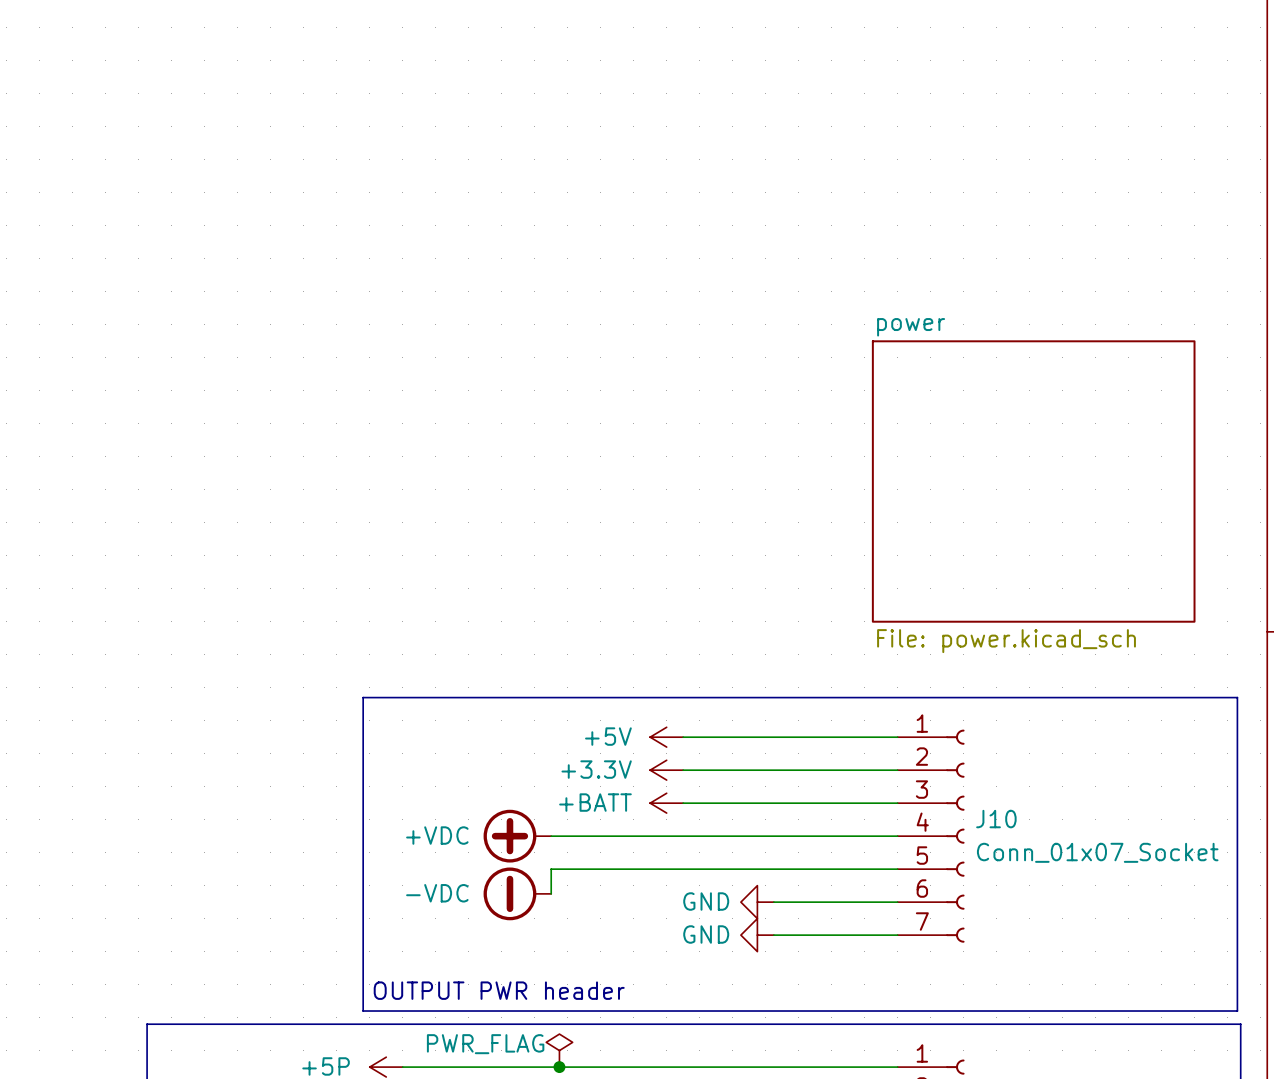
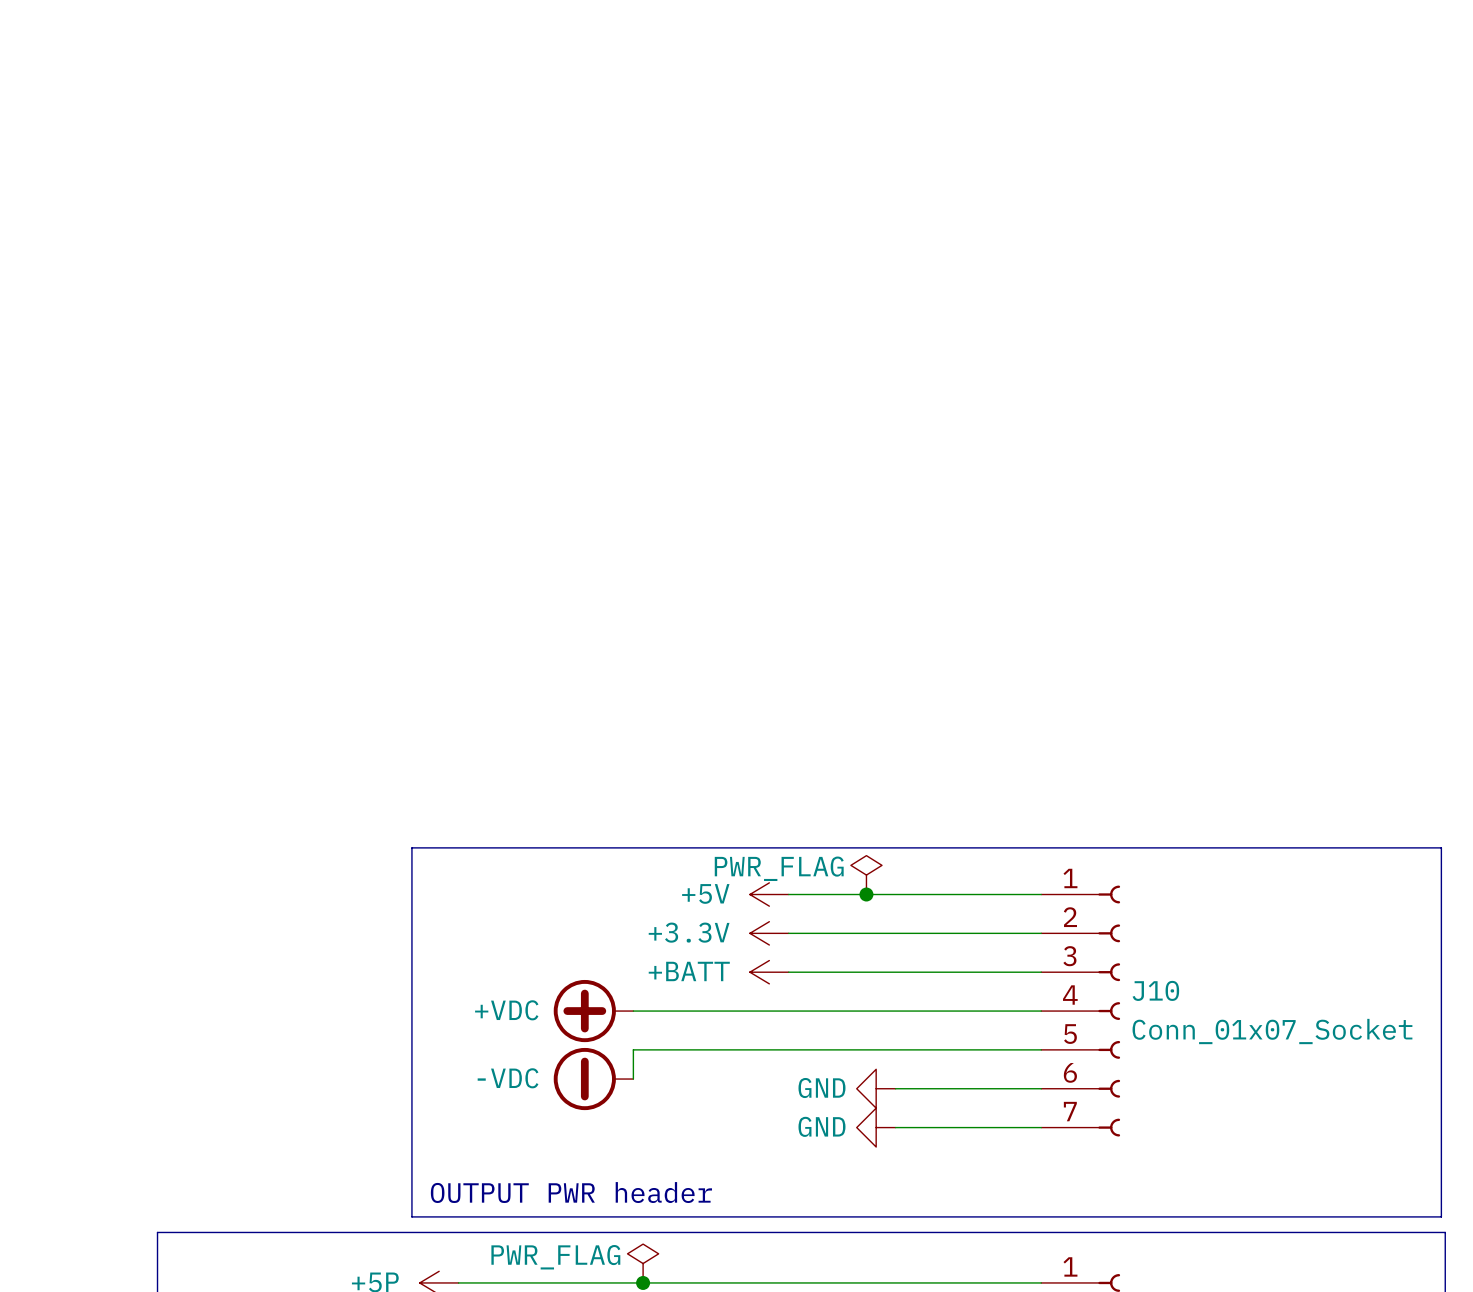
sheet power: File: power.kicad_sch (1033, 481) -> none
power symbol: none -> PWR_FLAG (866, 875)
junction: none -> (866, 894)

